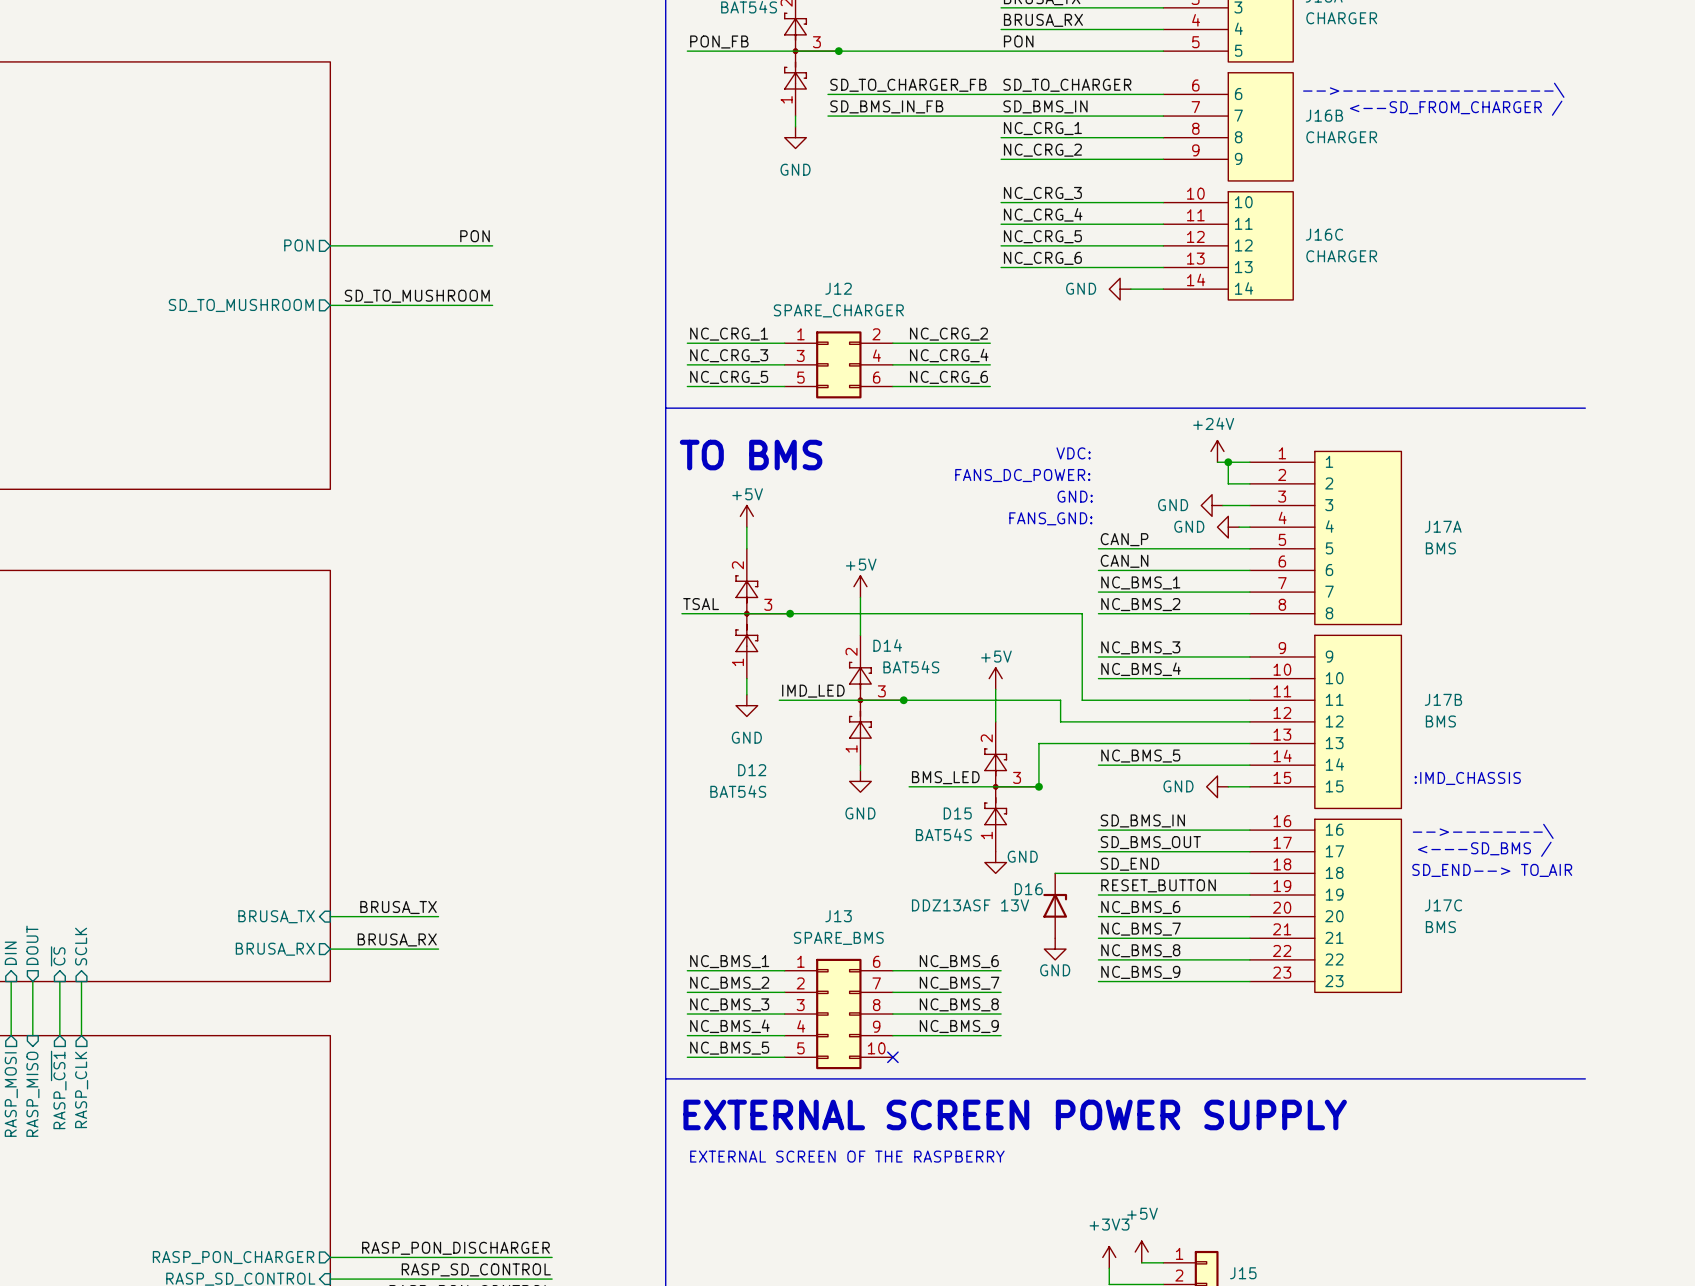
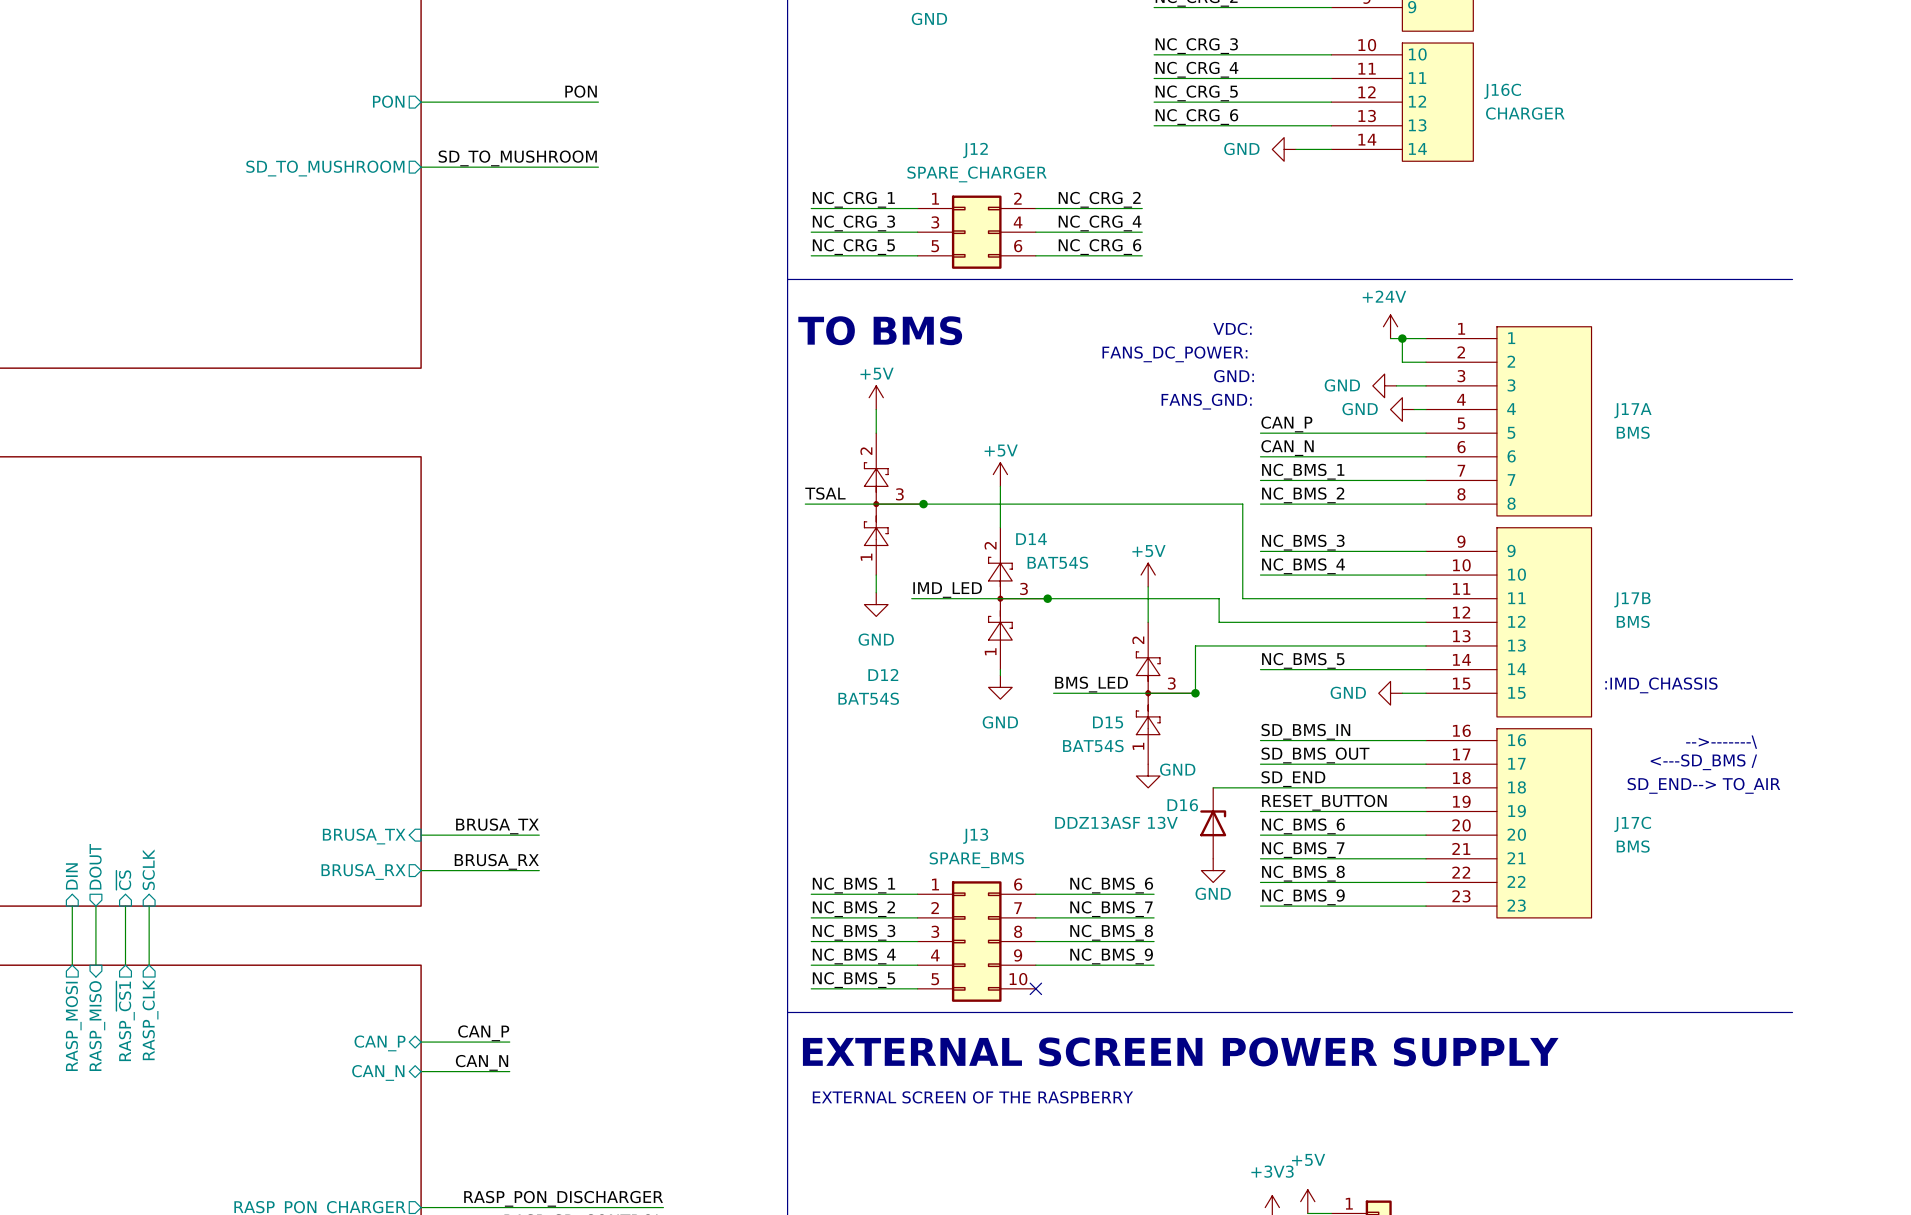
label: none -> CAN_P (483, 1033)
wire: none -> (421, 1042) (509, 1042)
sheet pin: none -> CAN_P (380, 1043)
label: none -> CAN_N (482, 1062)
sheet pin: none -> CAN_N (378, 1072)
wire: none -> (421, 1071) (509, 1071)

